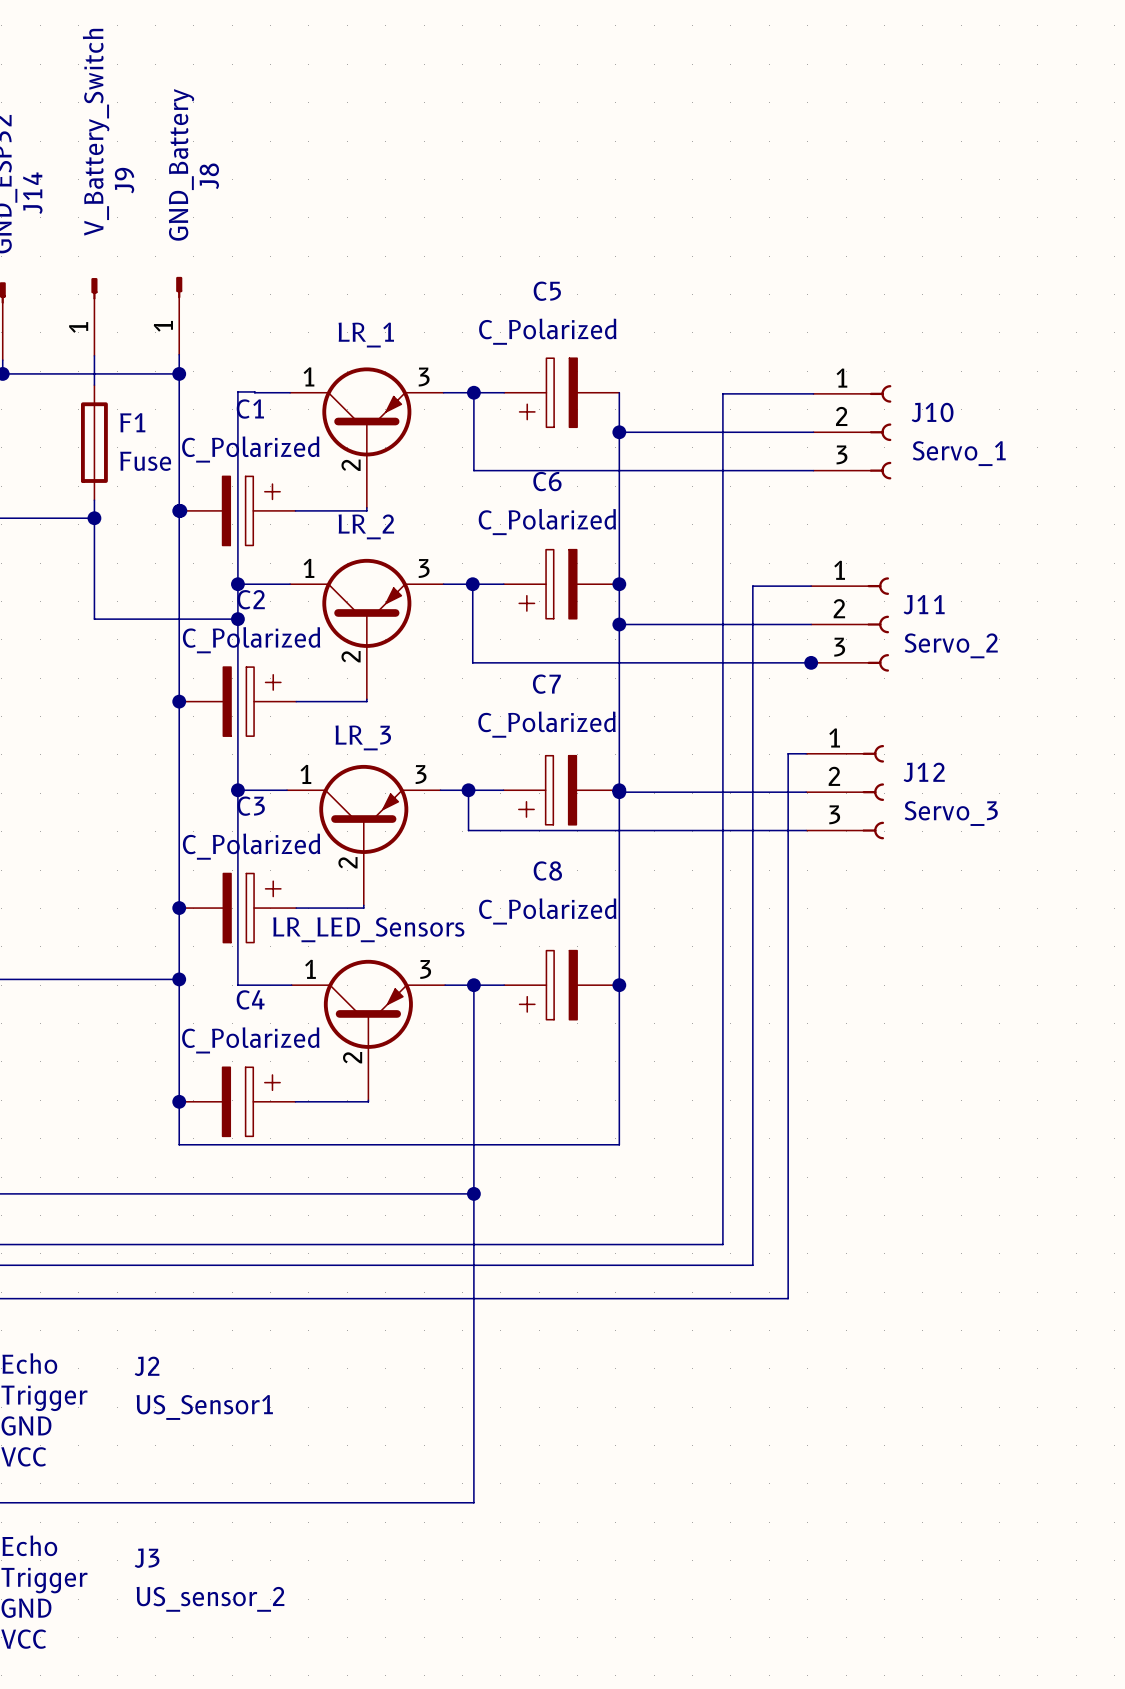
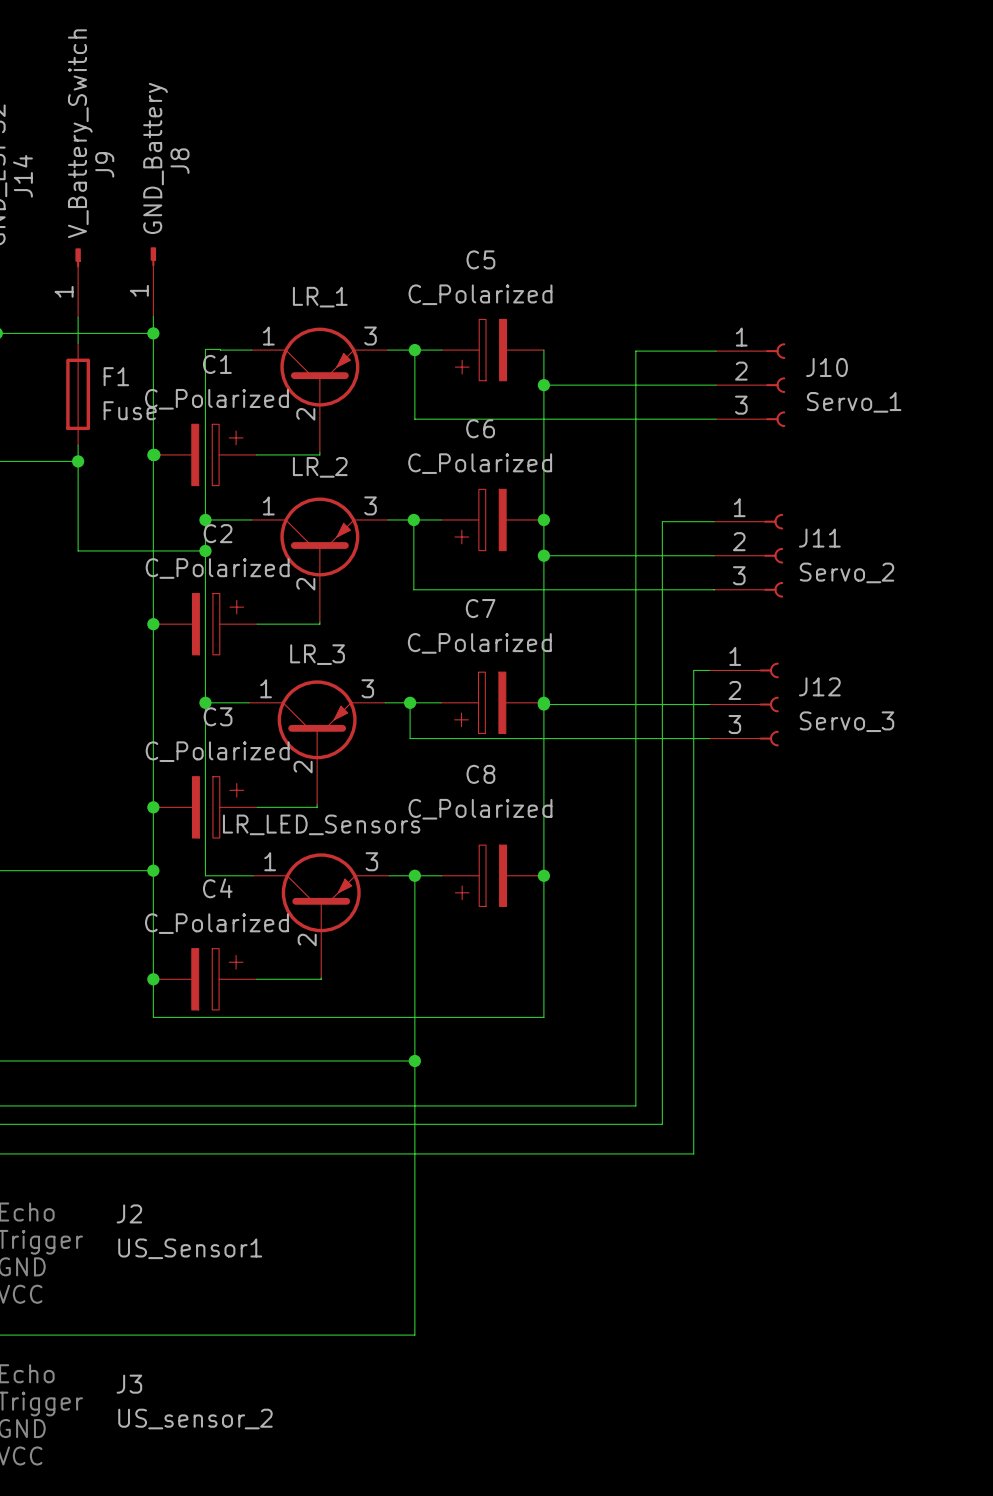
junction: (811, 662) -> none

